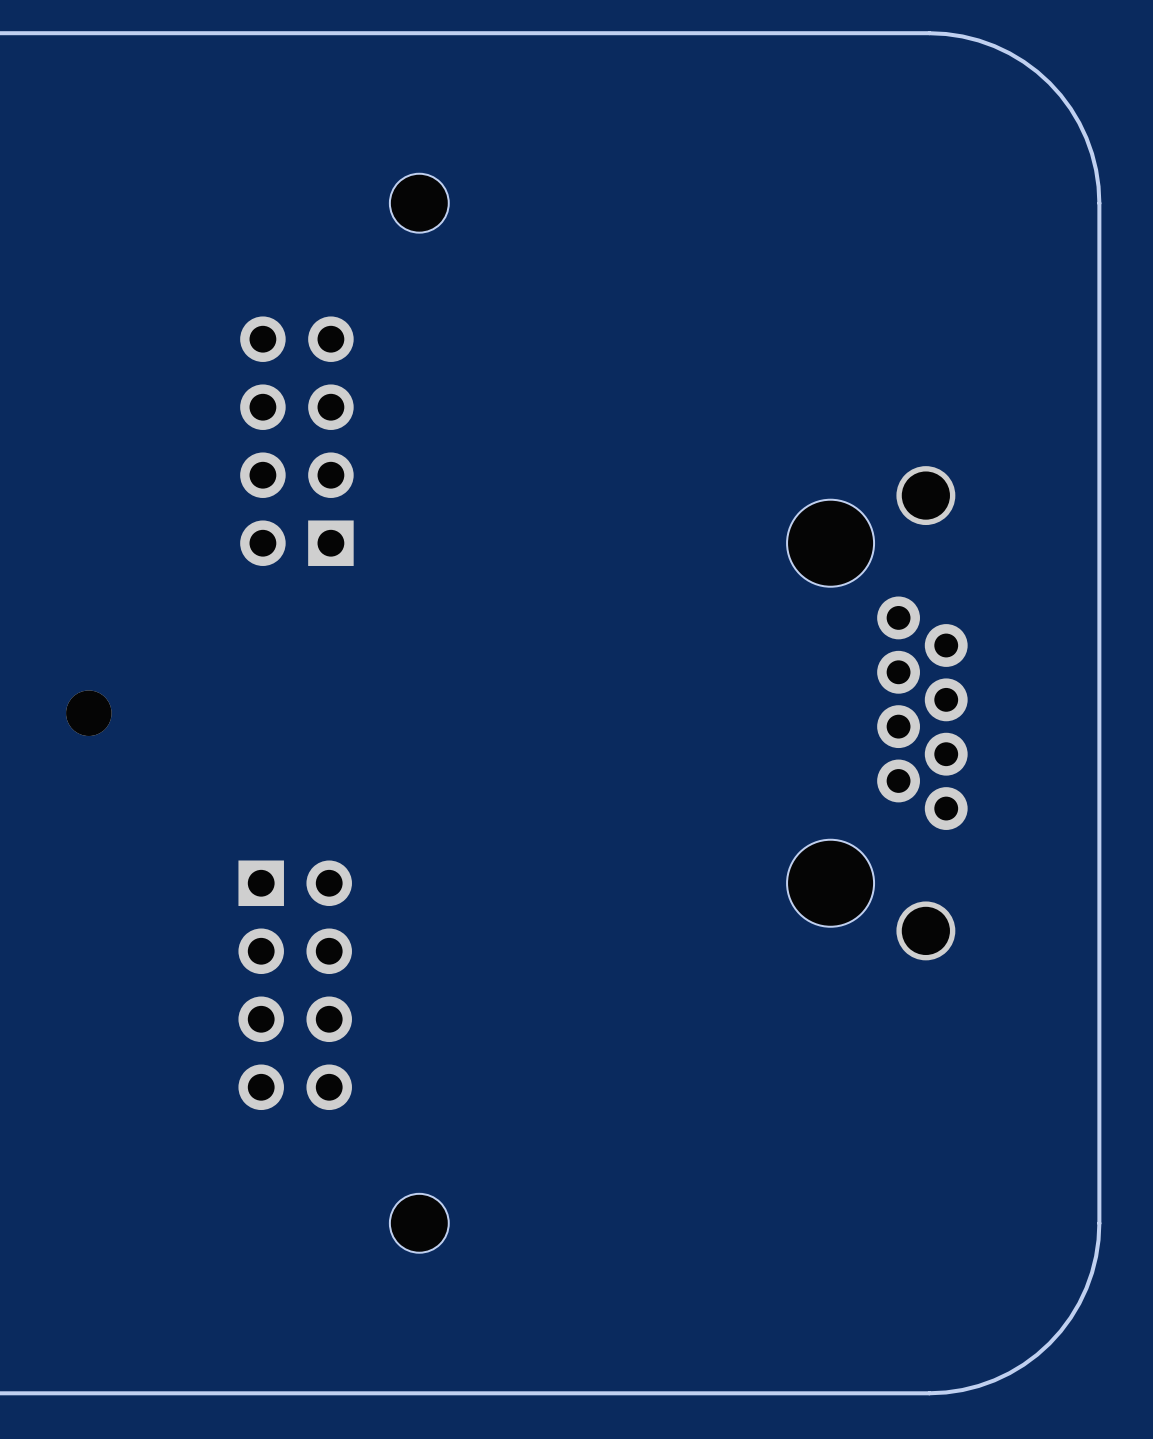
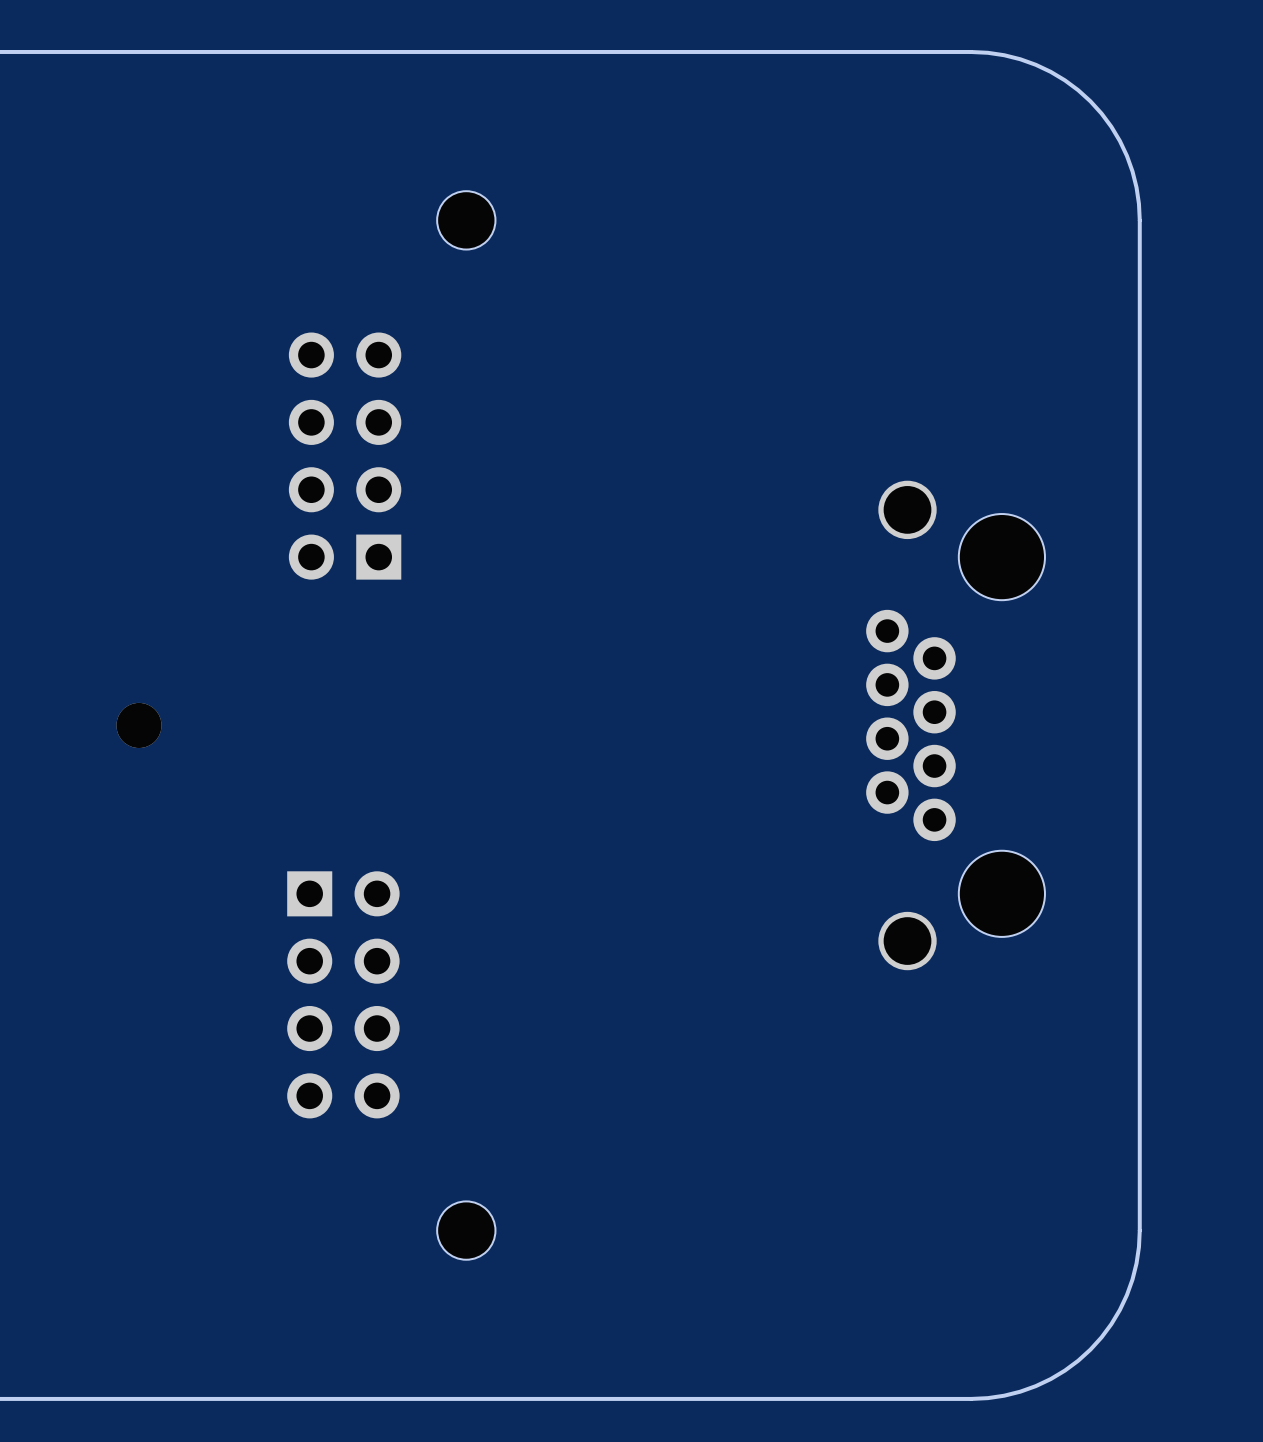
part rotation: 0° (877, 713) -> 180° (955, 725)

